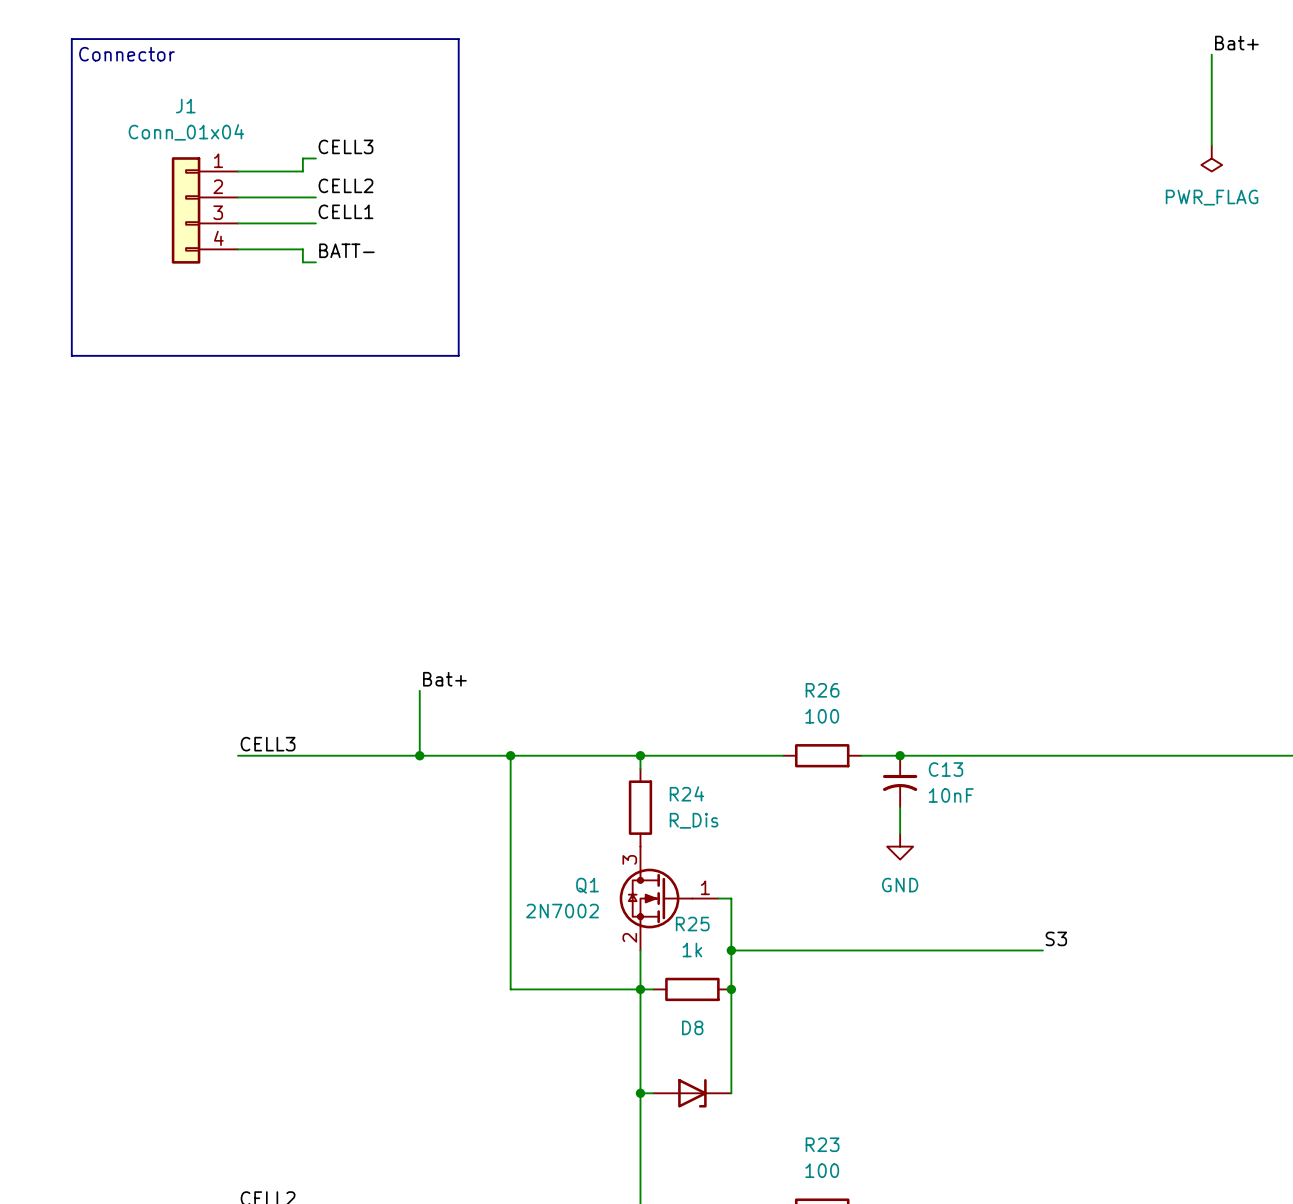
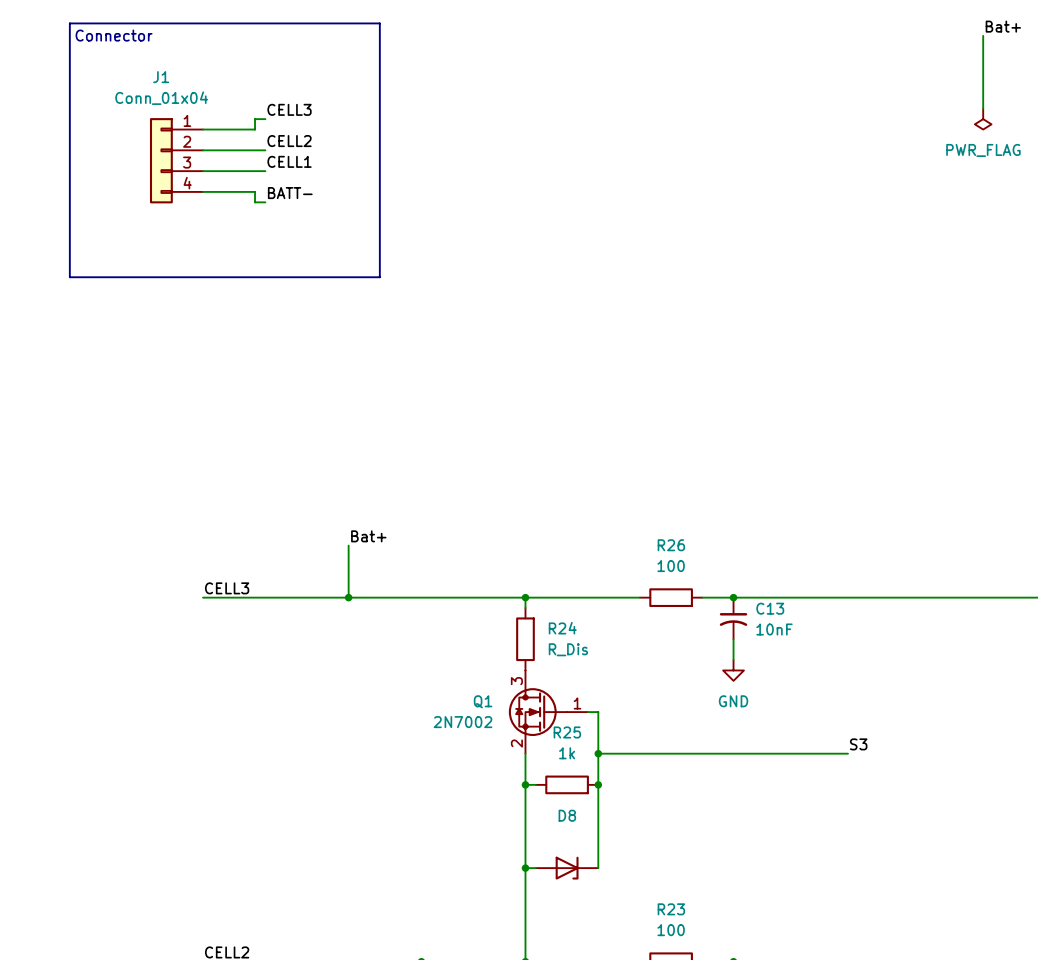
wire: (510, 755) (510, 989) (640, 989) -> none
junction: (510, 755) -> none

